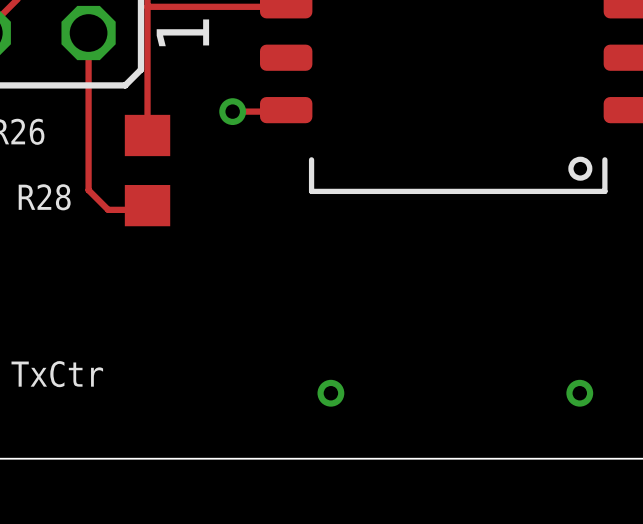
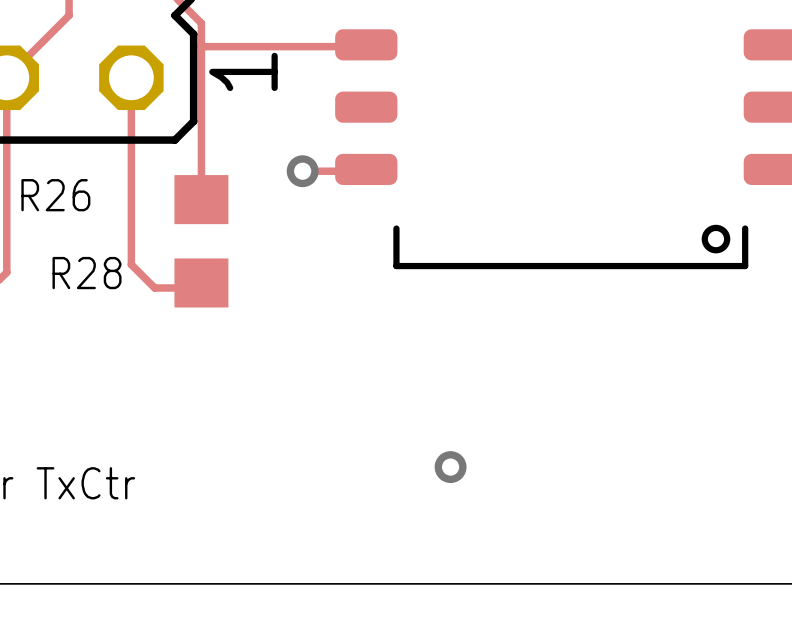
via position: (330, 393) -> (450, 467)
via: (579, 393) -> none

